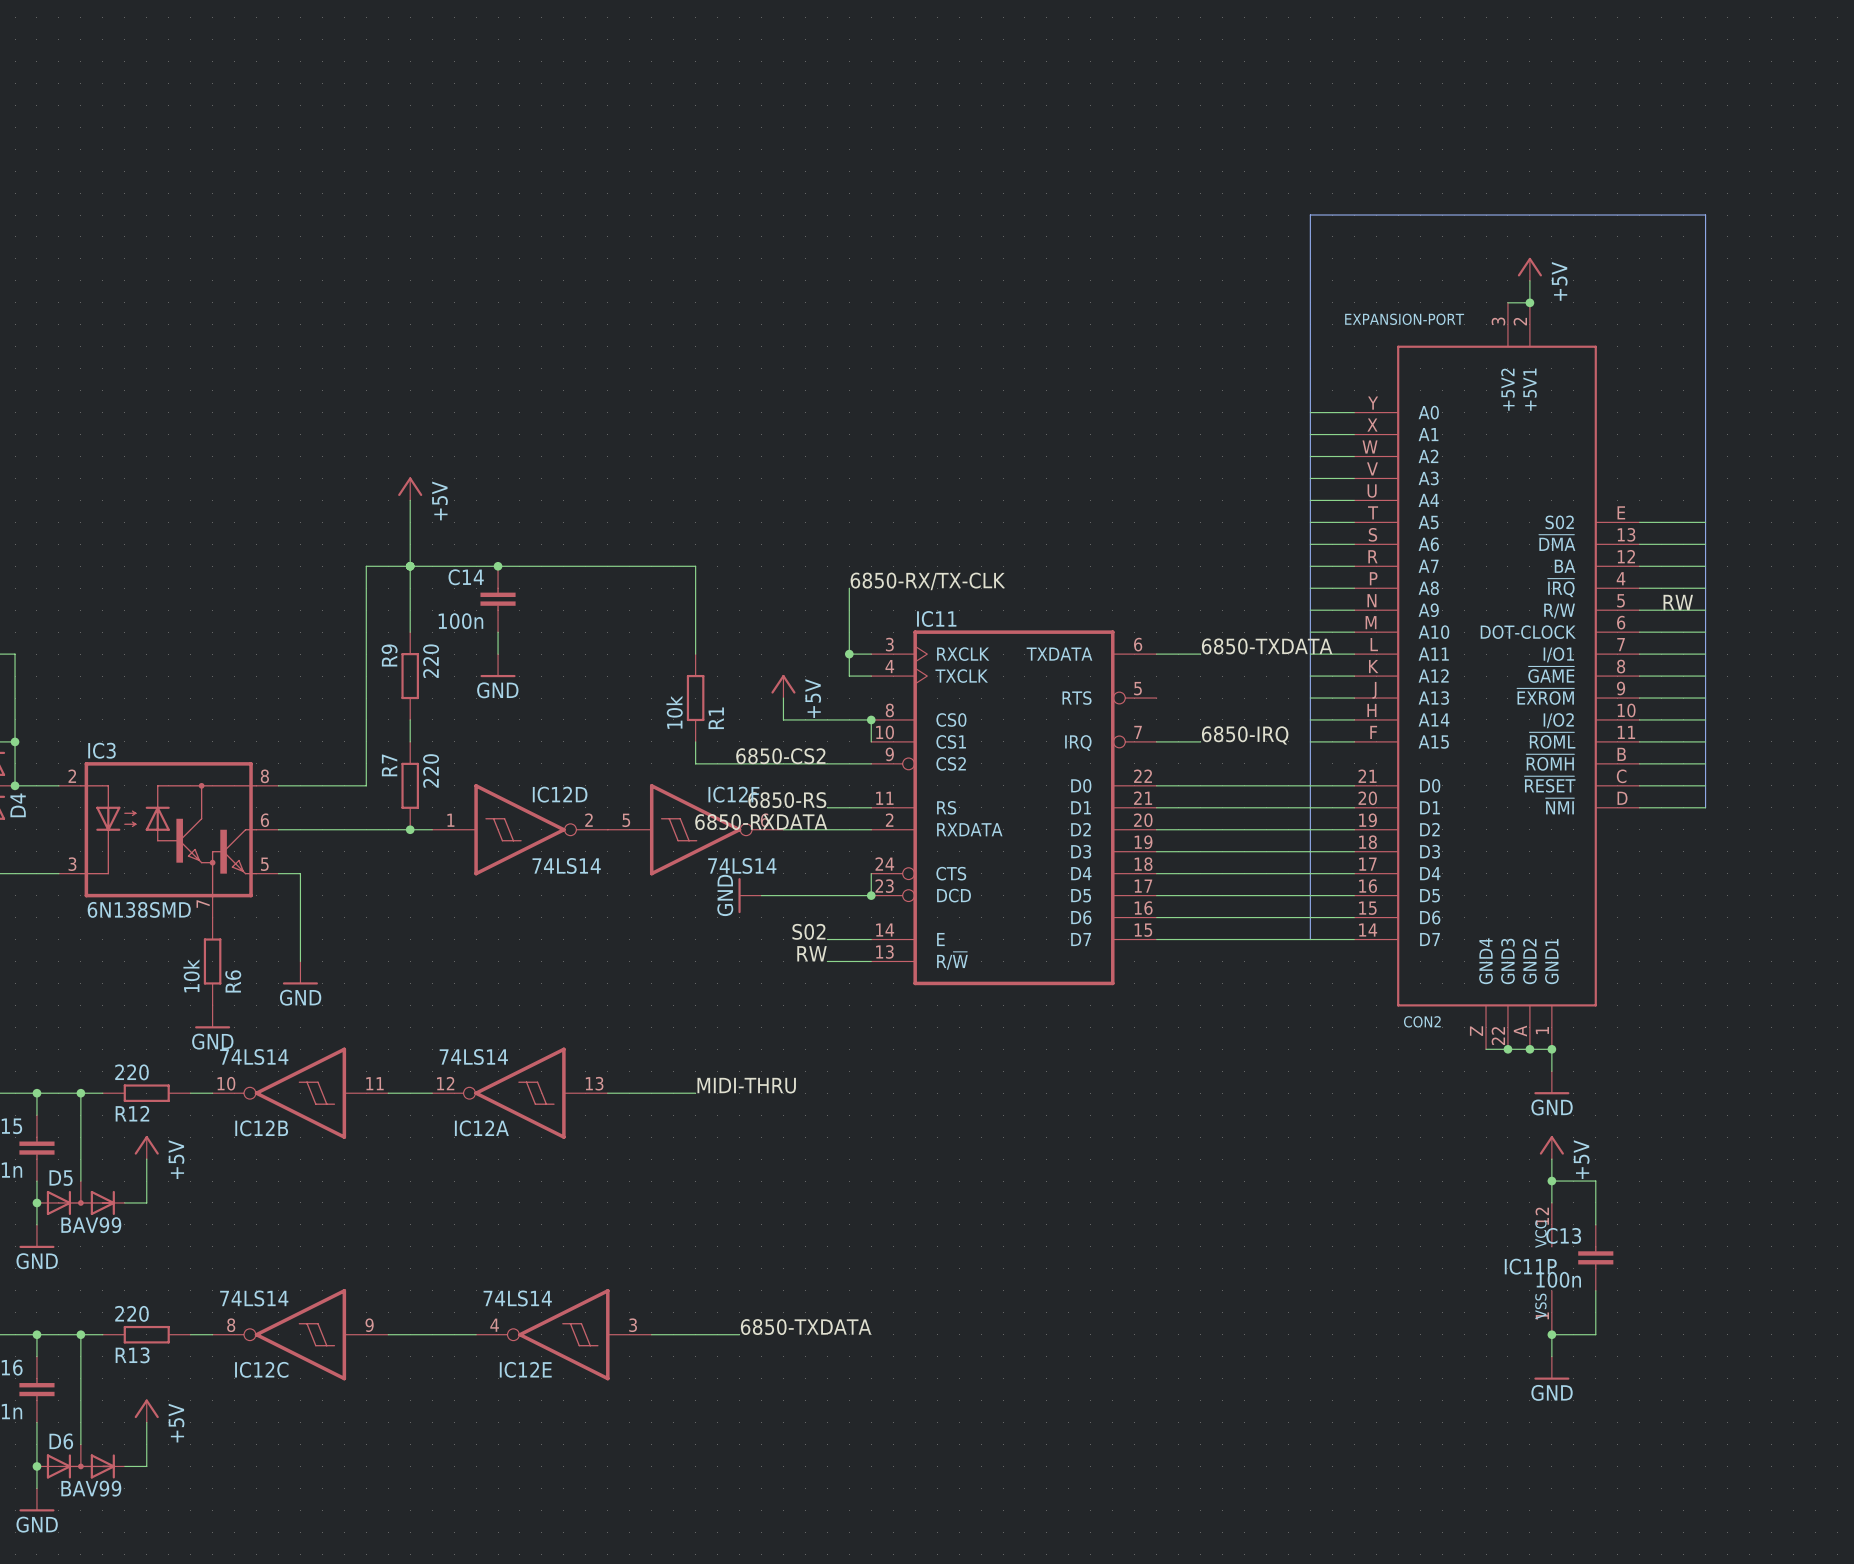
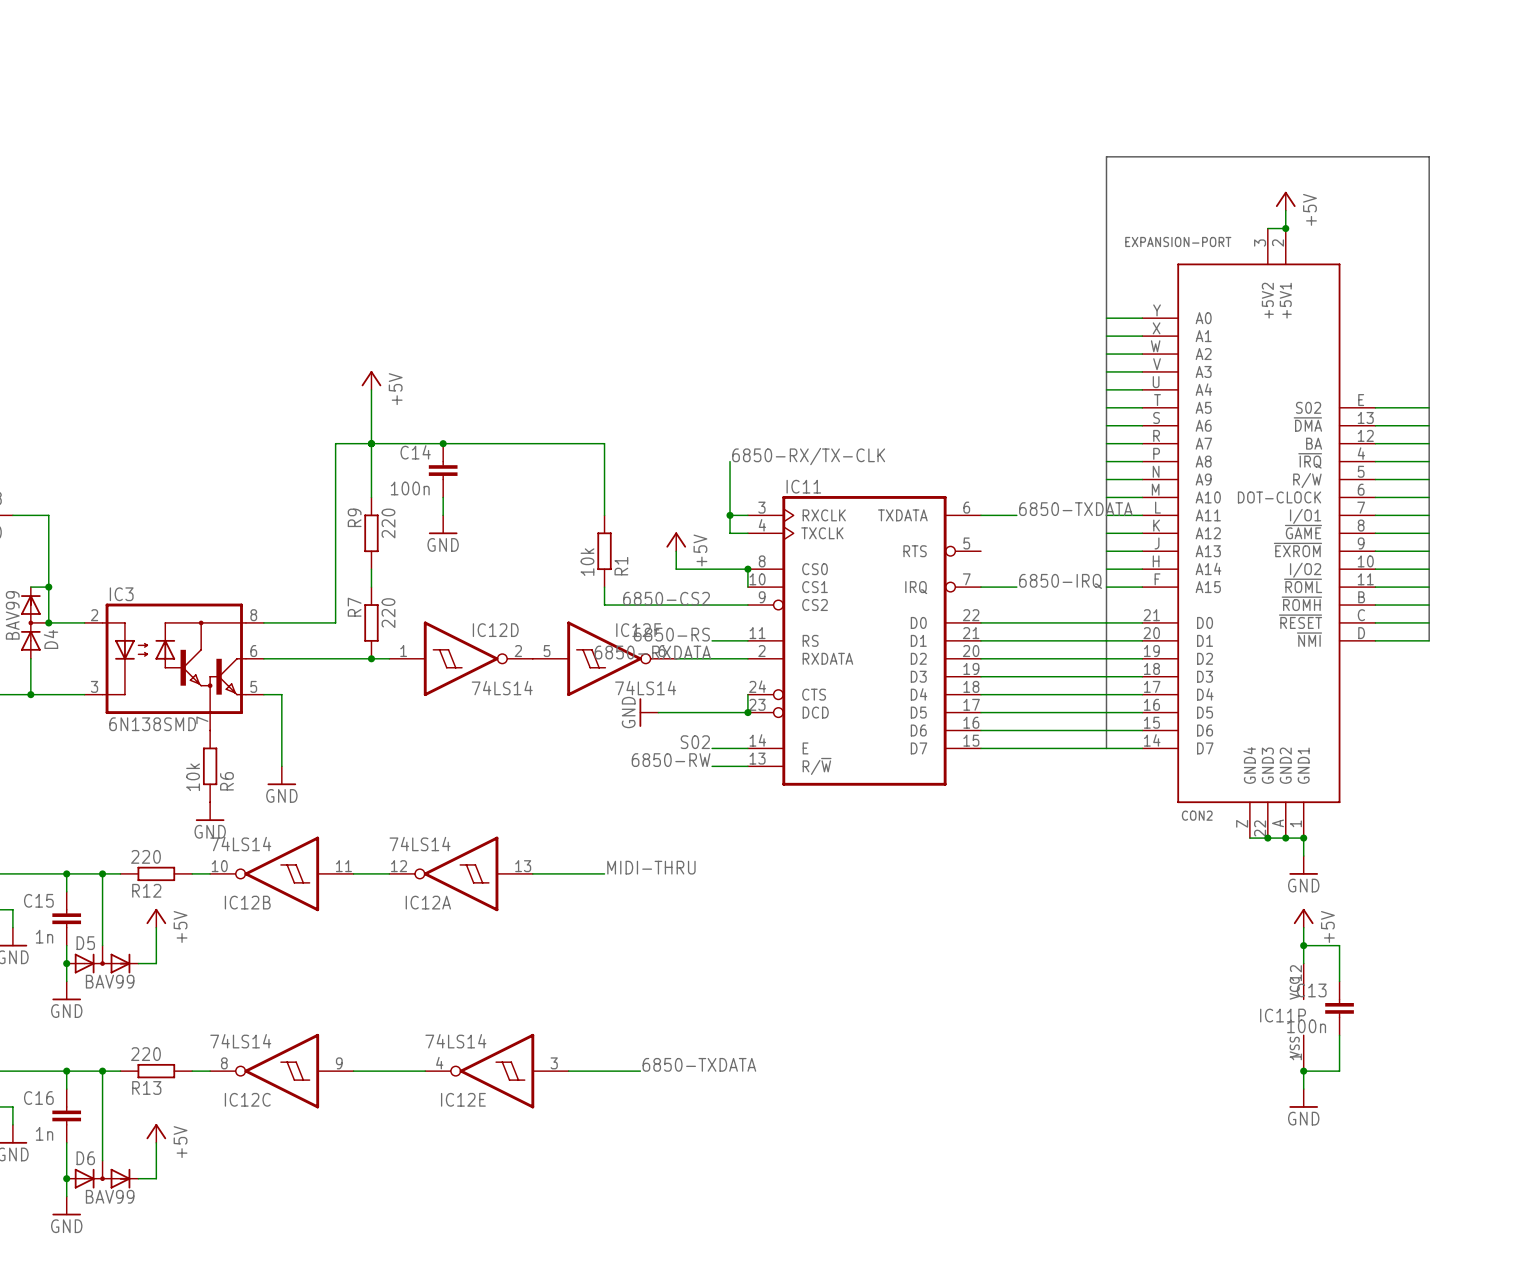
label: RW (1678, 602) -> none
label: RW (812, 953) -> 6850-RW (671, 760)

